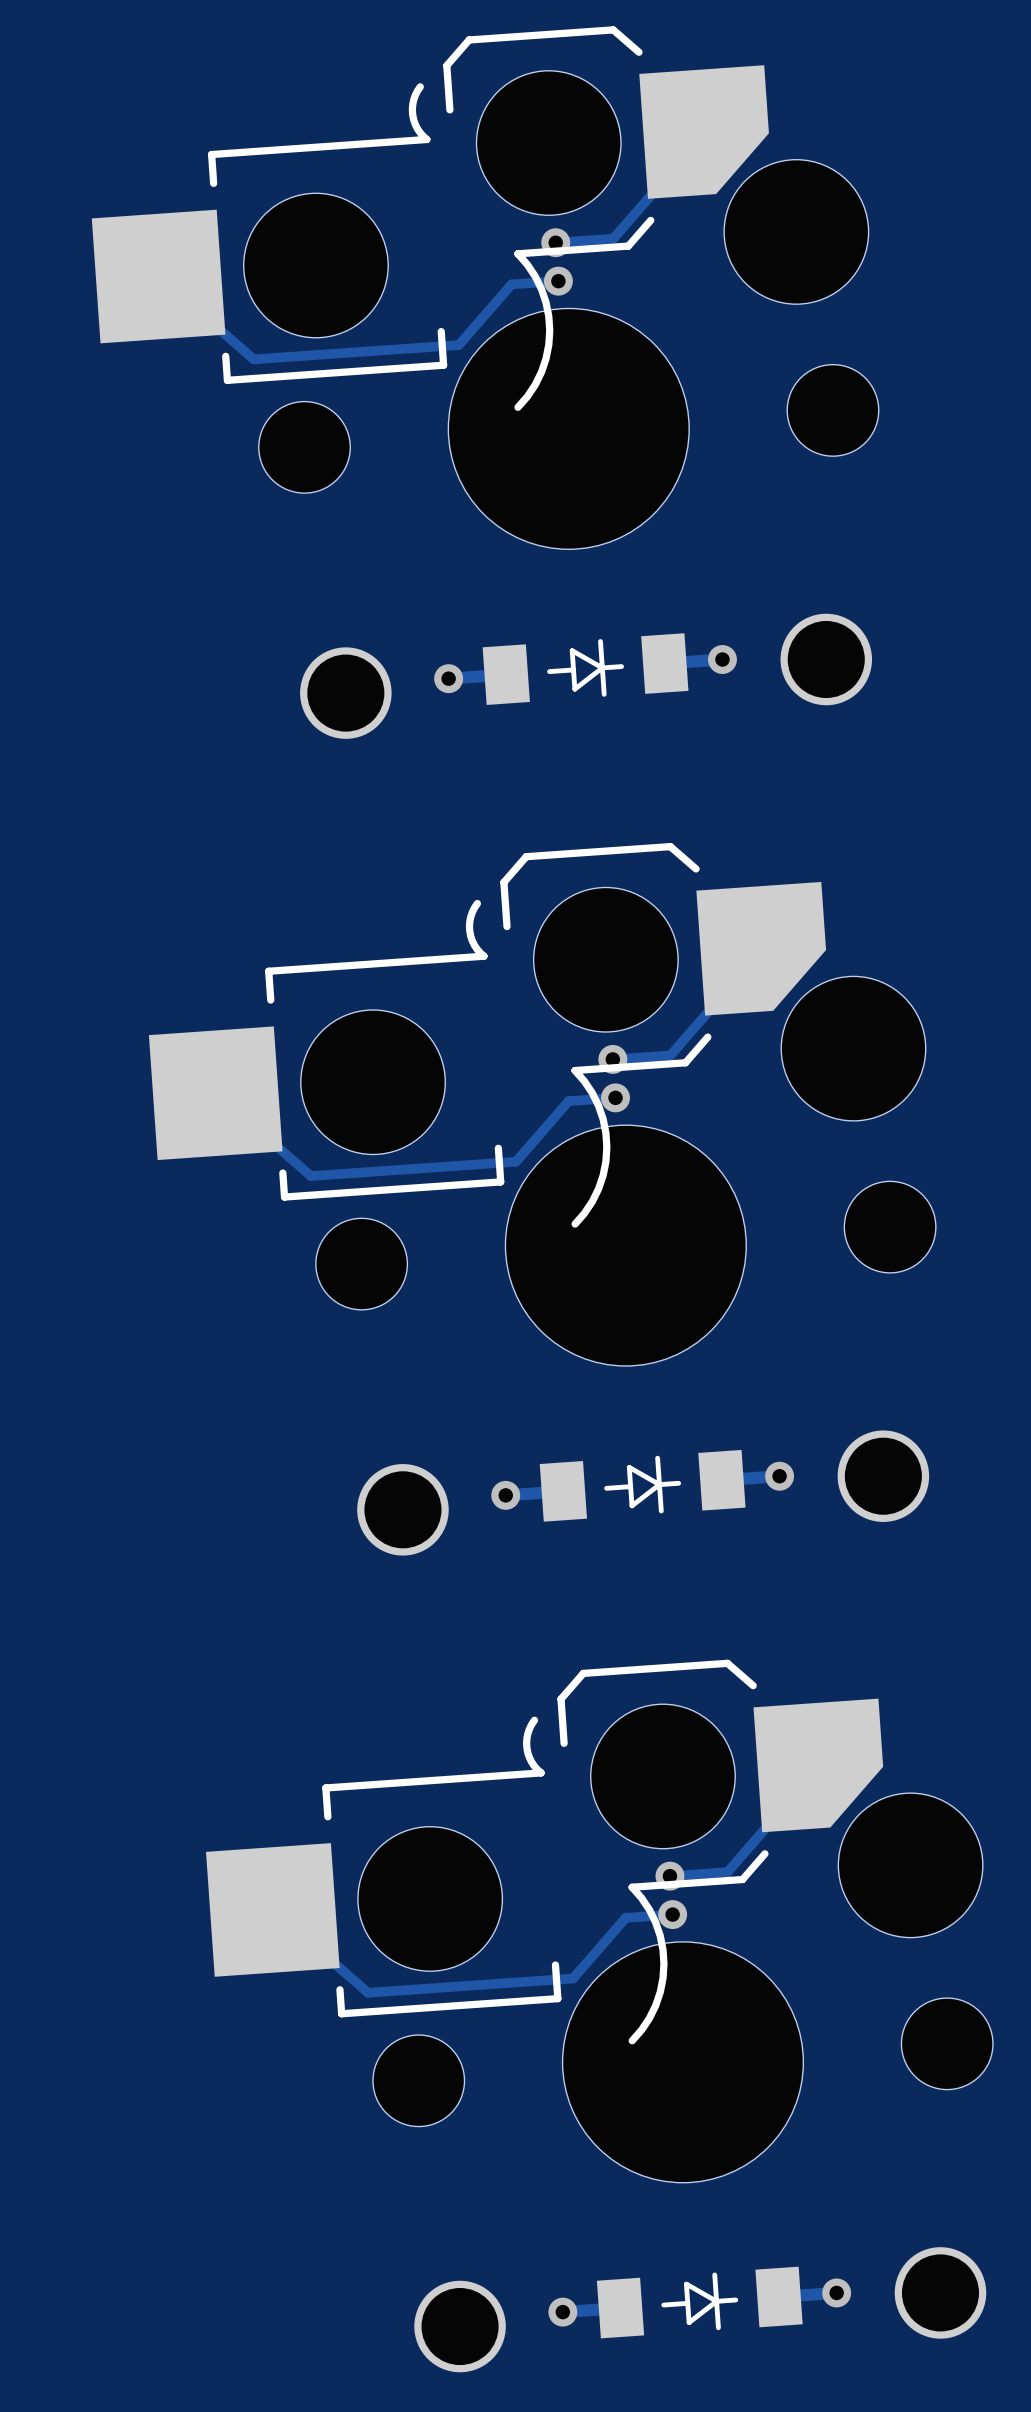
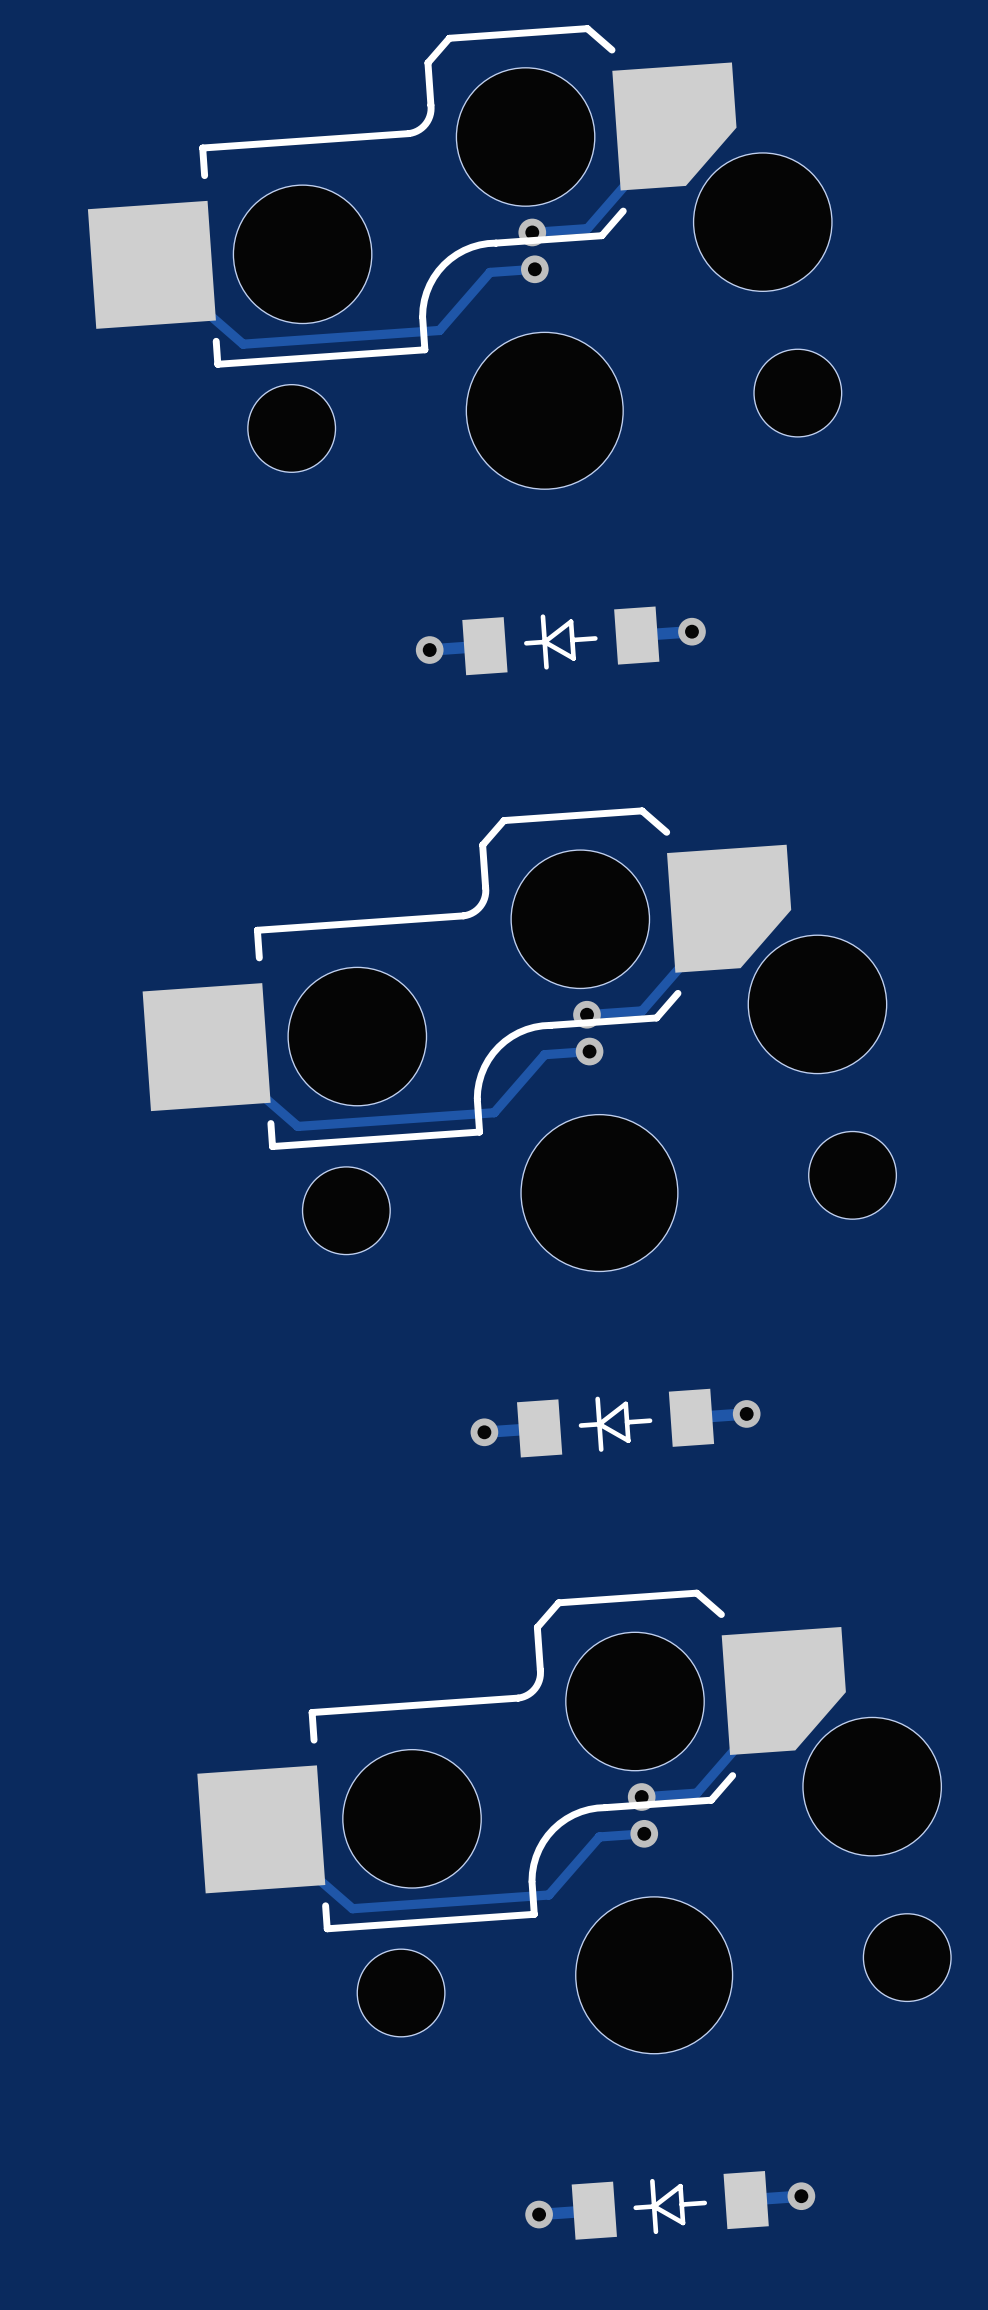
part: none -> (464, 257)
part: (485, 382) -> none
part rotation: 0° (585, 669) -> 180° (560, 640)
part: none -> (519, 1039)
part: (542, 1199) -> none
part rotation: 0° (642, 1485) -> 180° (615, 1423)
part: none -> (574, 1821)
part: (599, 2015) -> none
part rotation: 0° (699, 2302) -> 180° (670, 2205)

